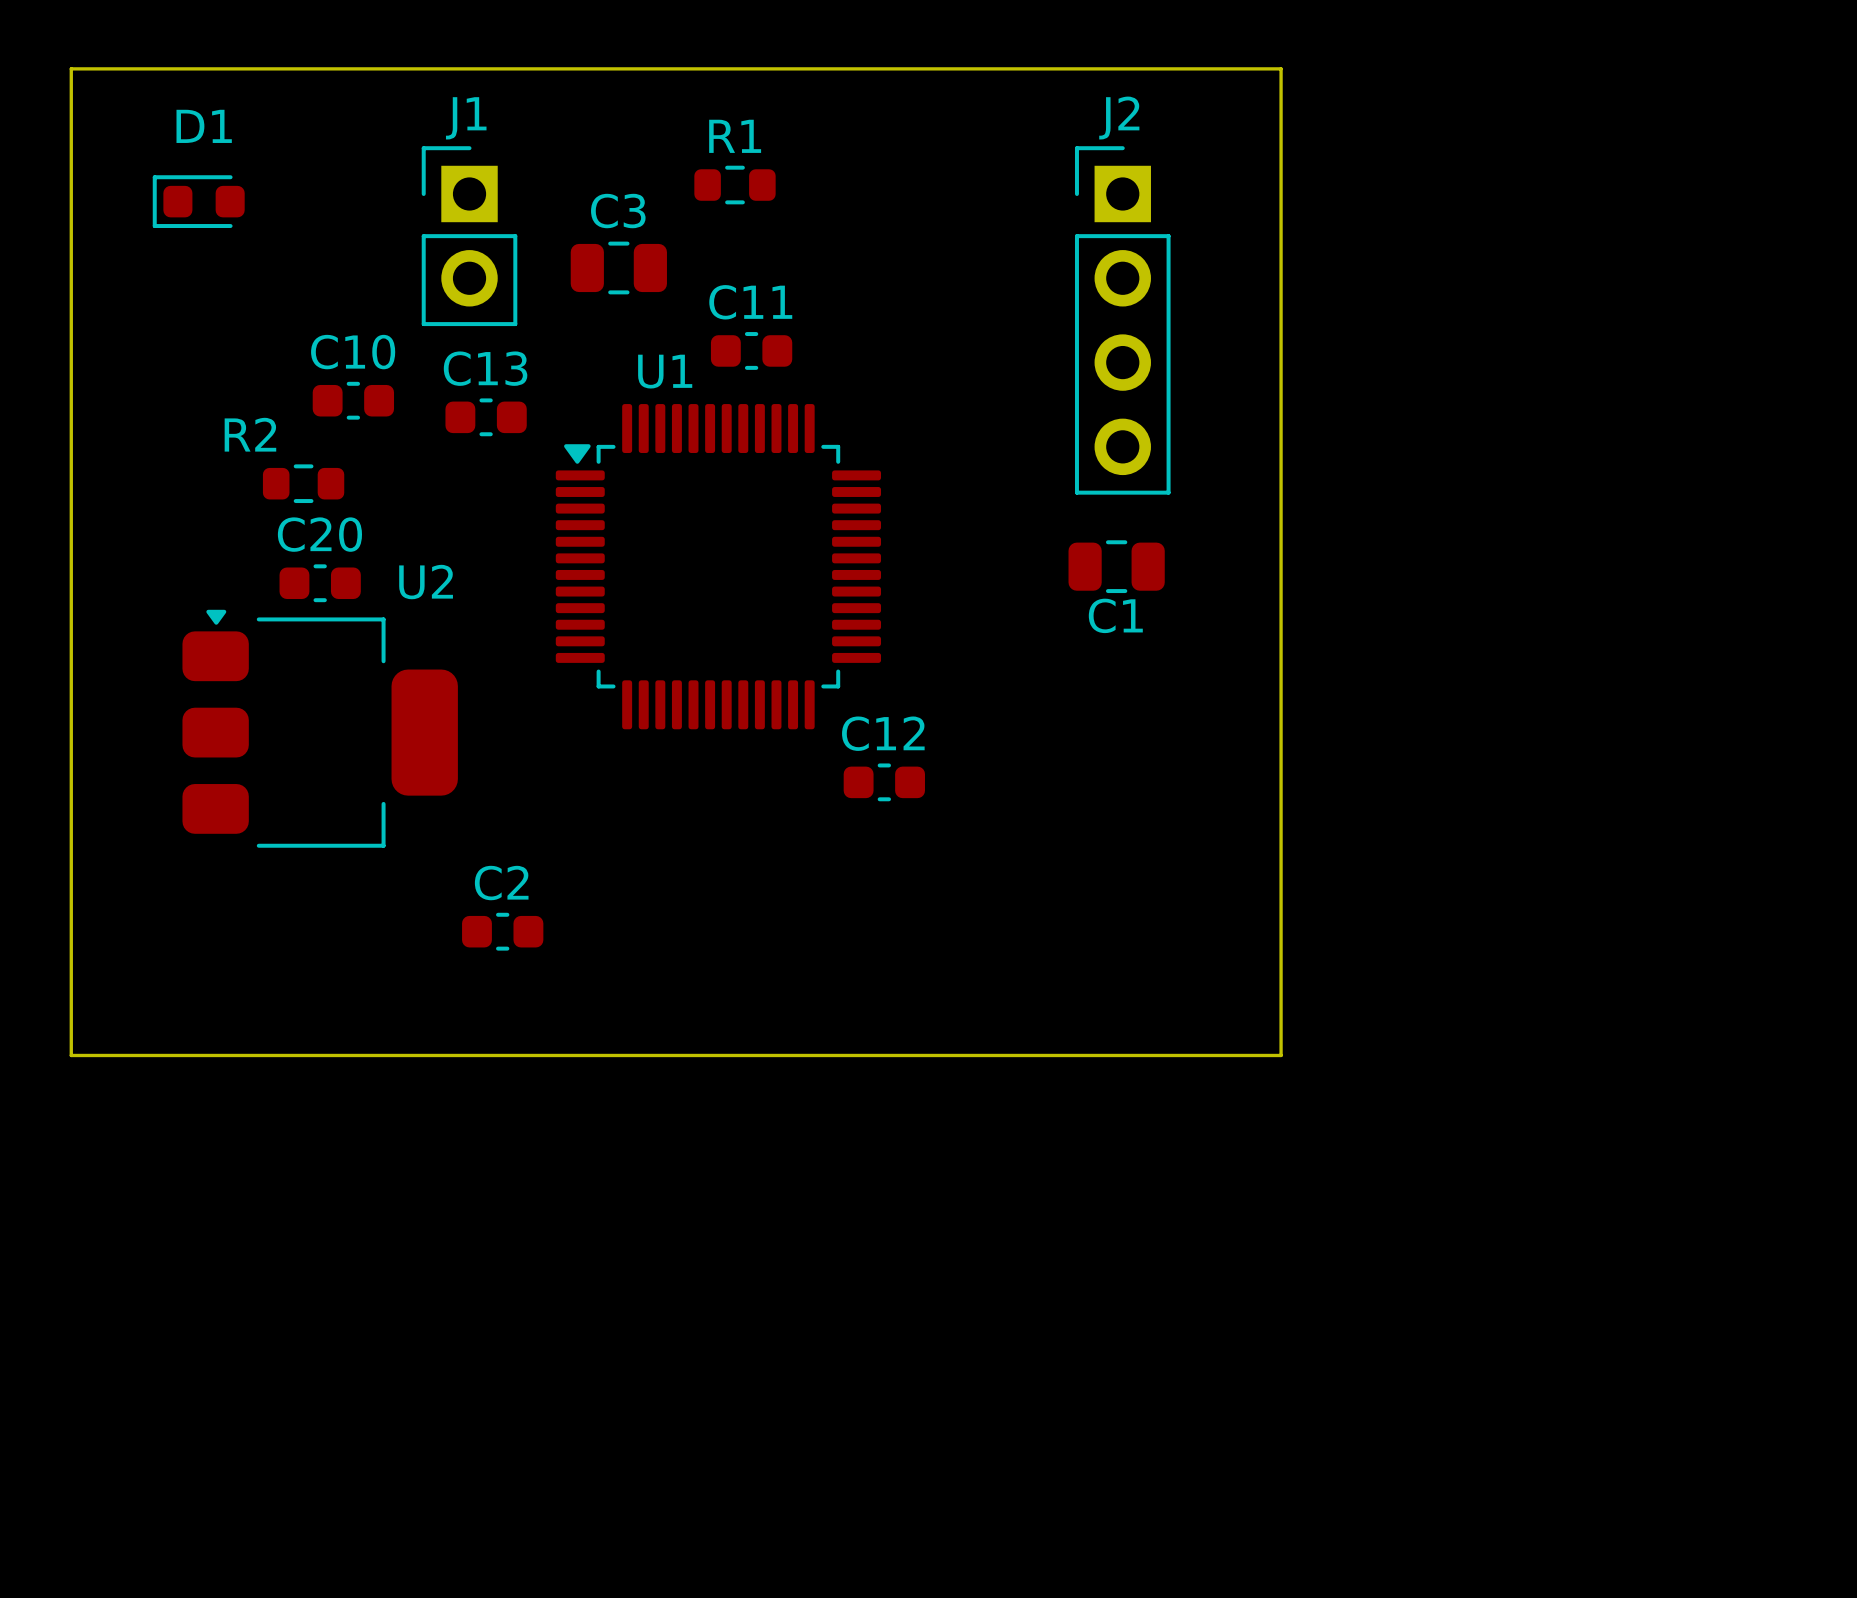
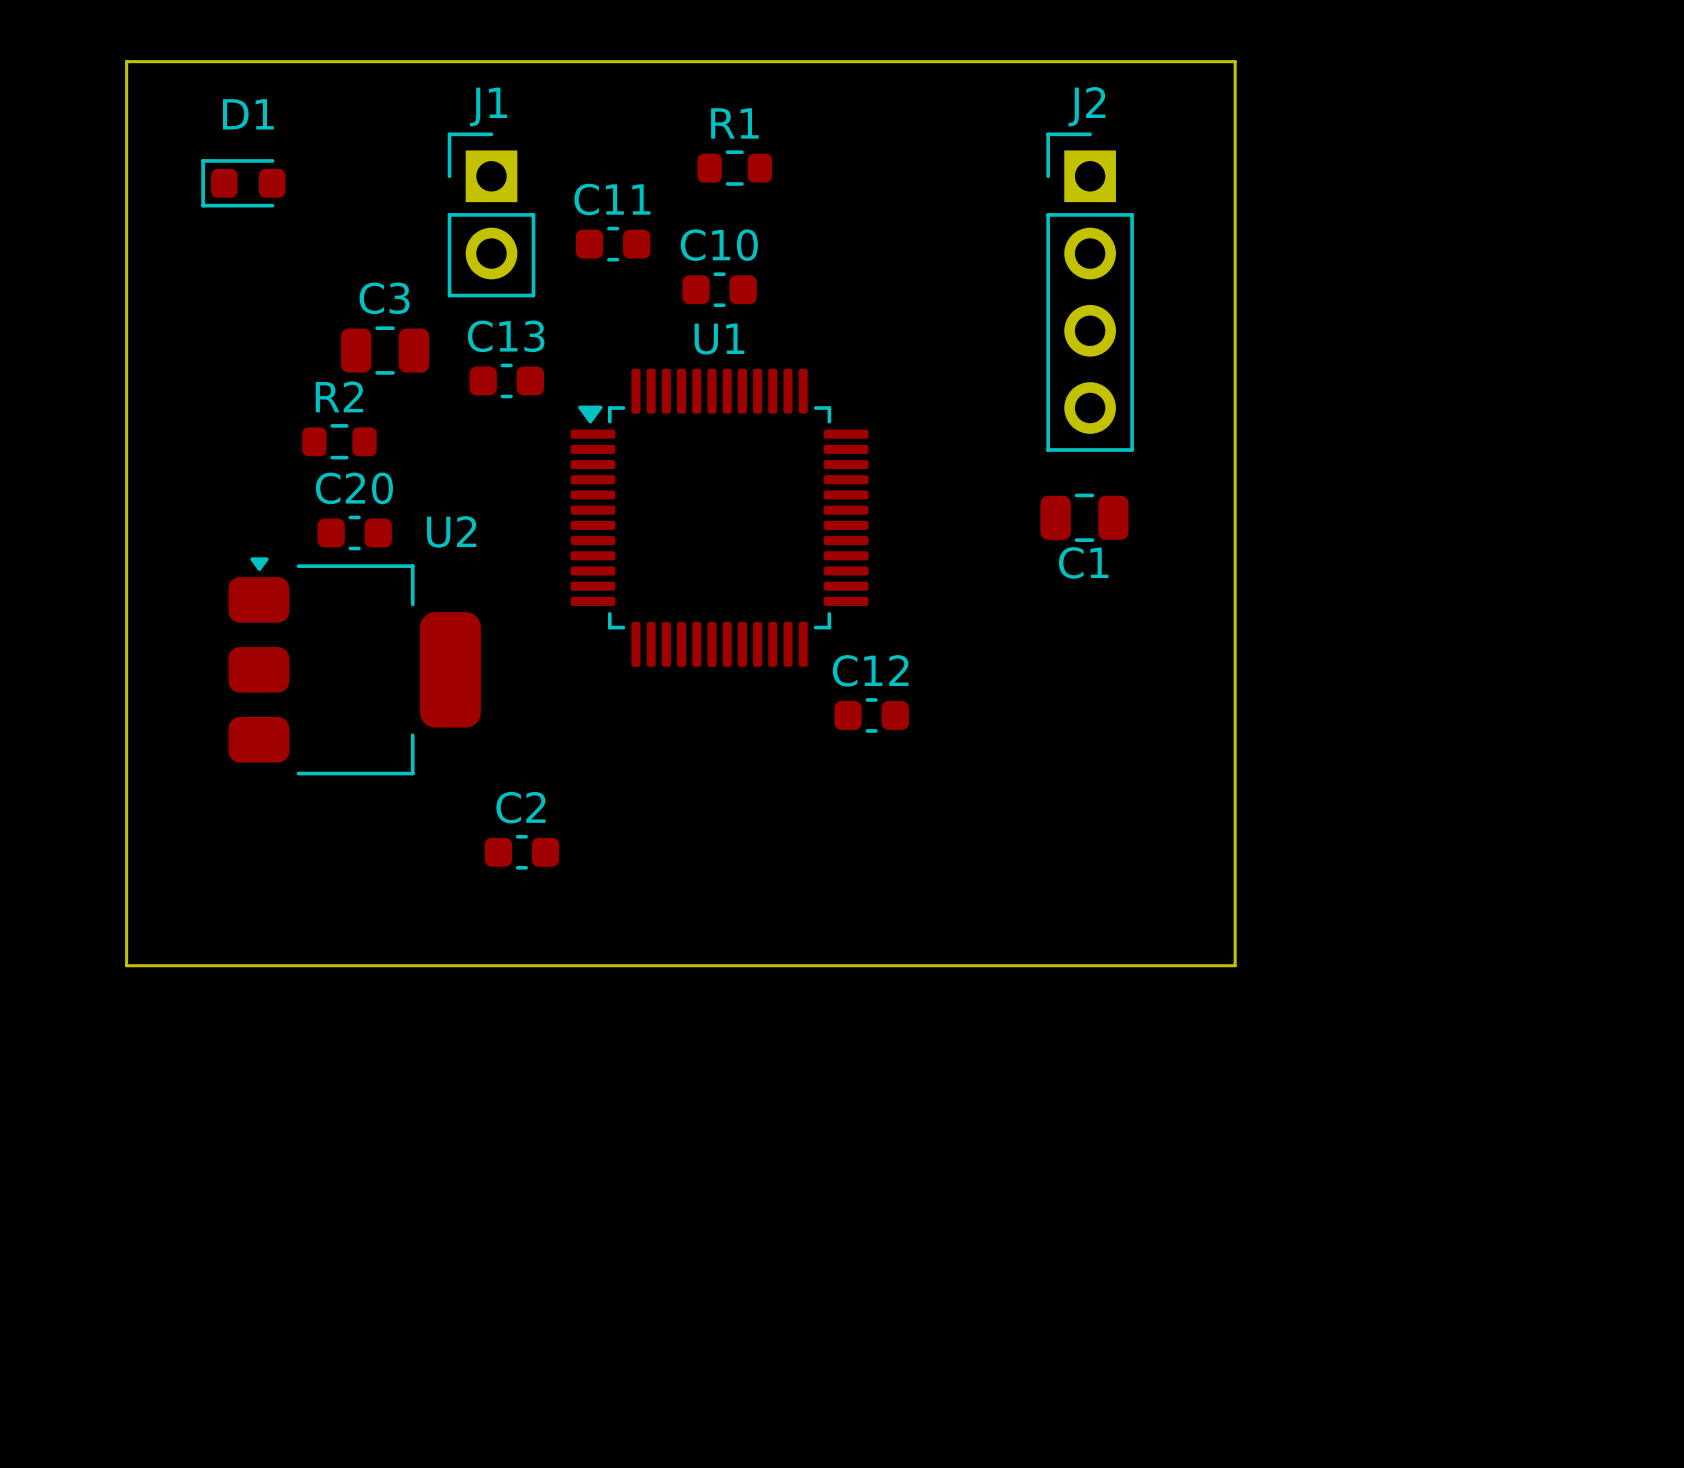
C3 position: (618, 267) -> (385, 350)
C11 position: (751, 350) -> (613, 244)
U1 name position: U1 (665, 371) -> U1 (719, 339)
C10 position: (353, 400) -> (719, 289)
R2 name position: R2 (250, 434) -> R2 (339, 396)

